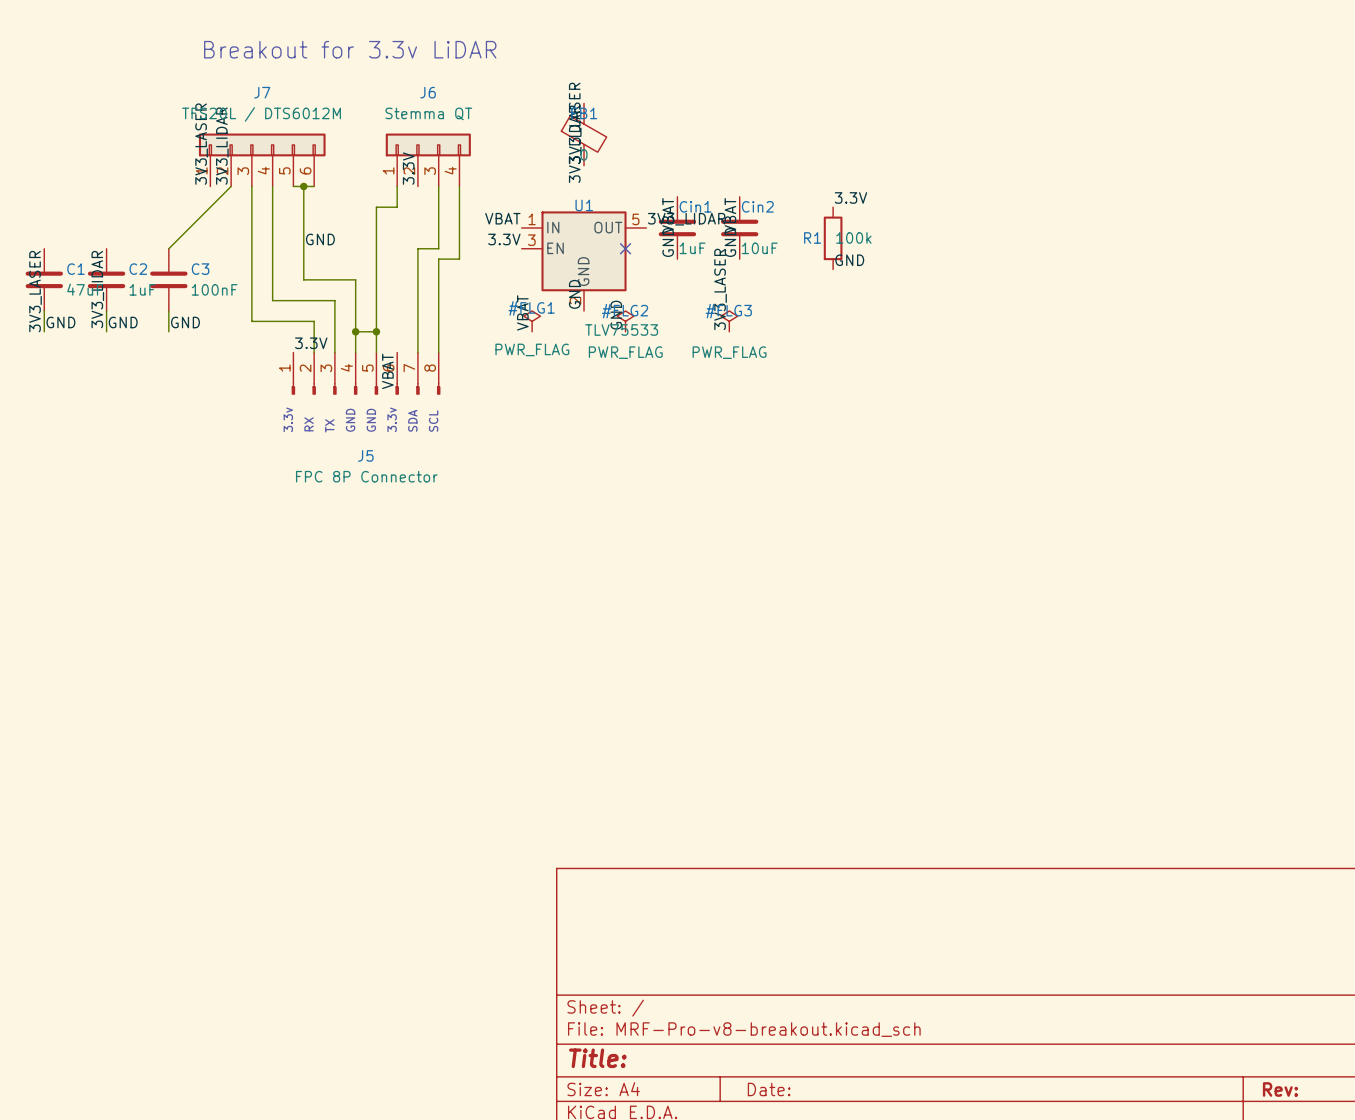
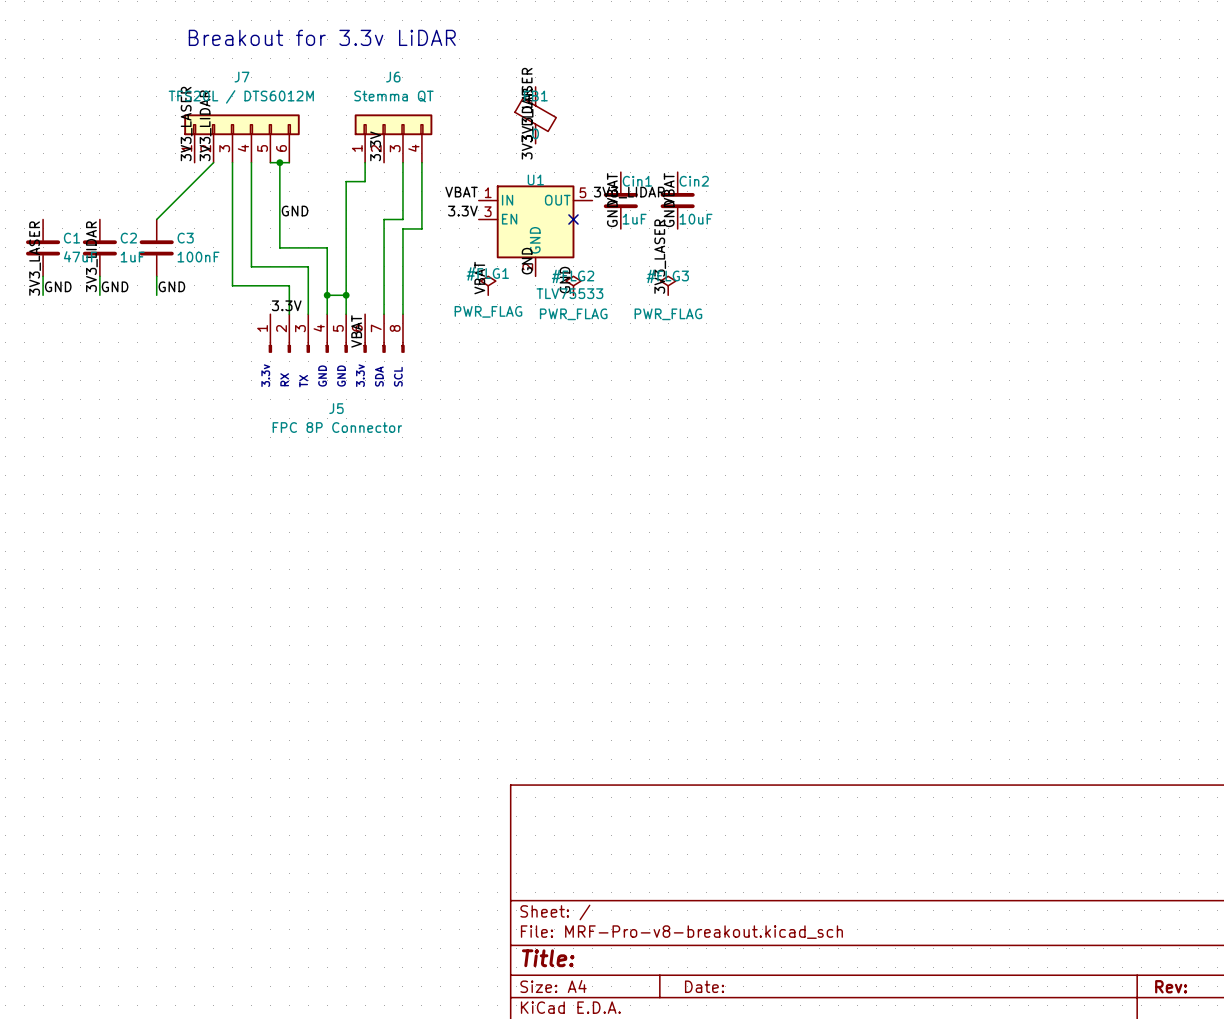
label: 3.3V (850, 197) -> none
R1: 100k (833, 238) -> none
label: GND (849, 260) -> none

